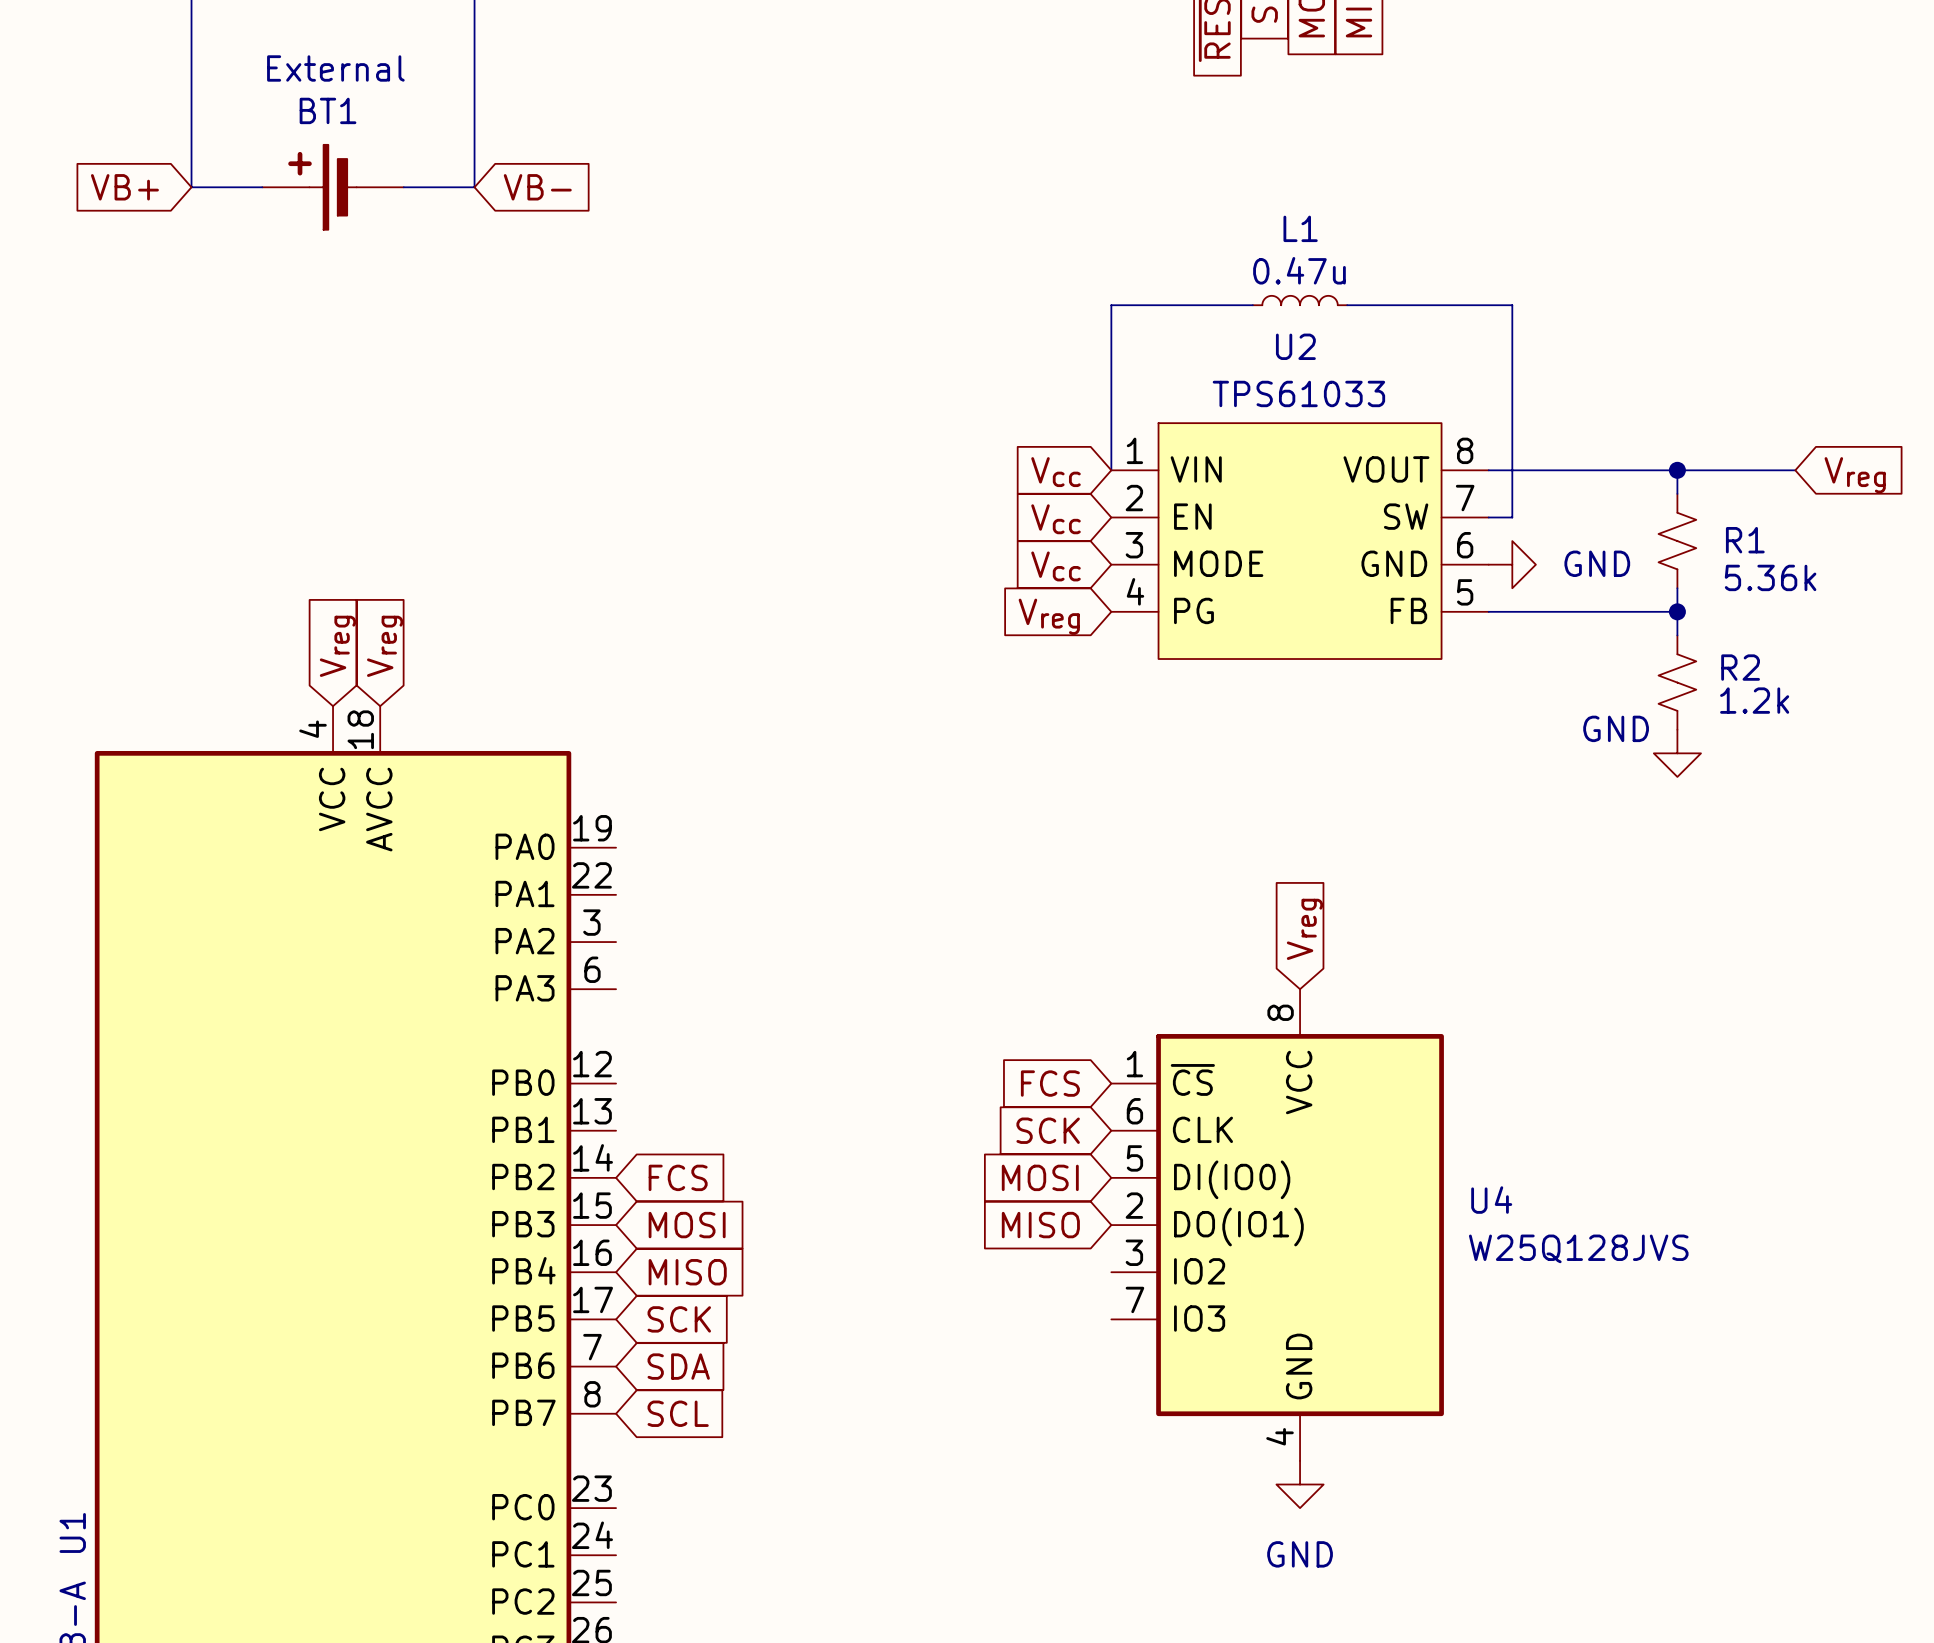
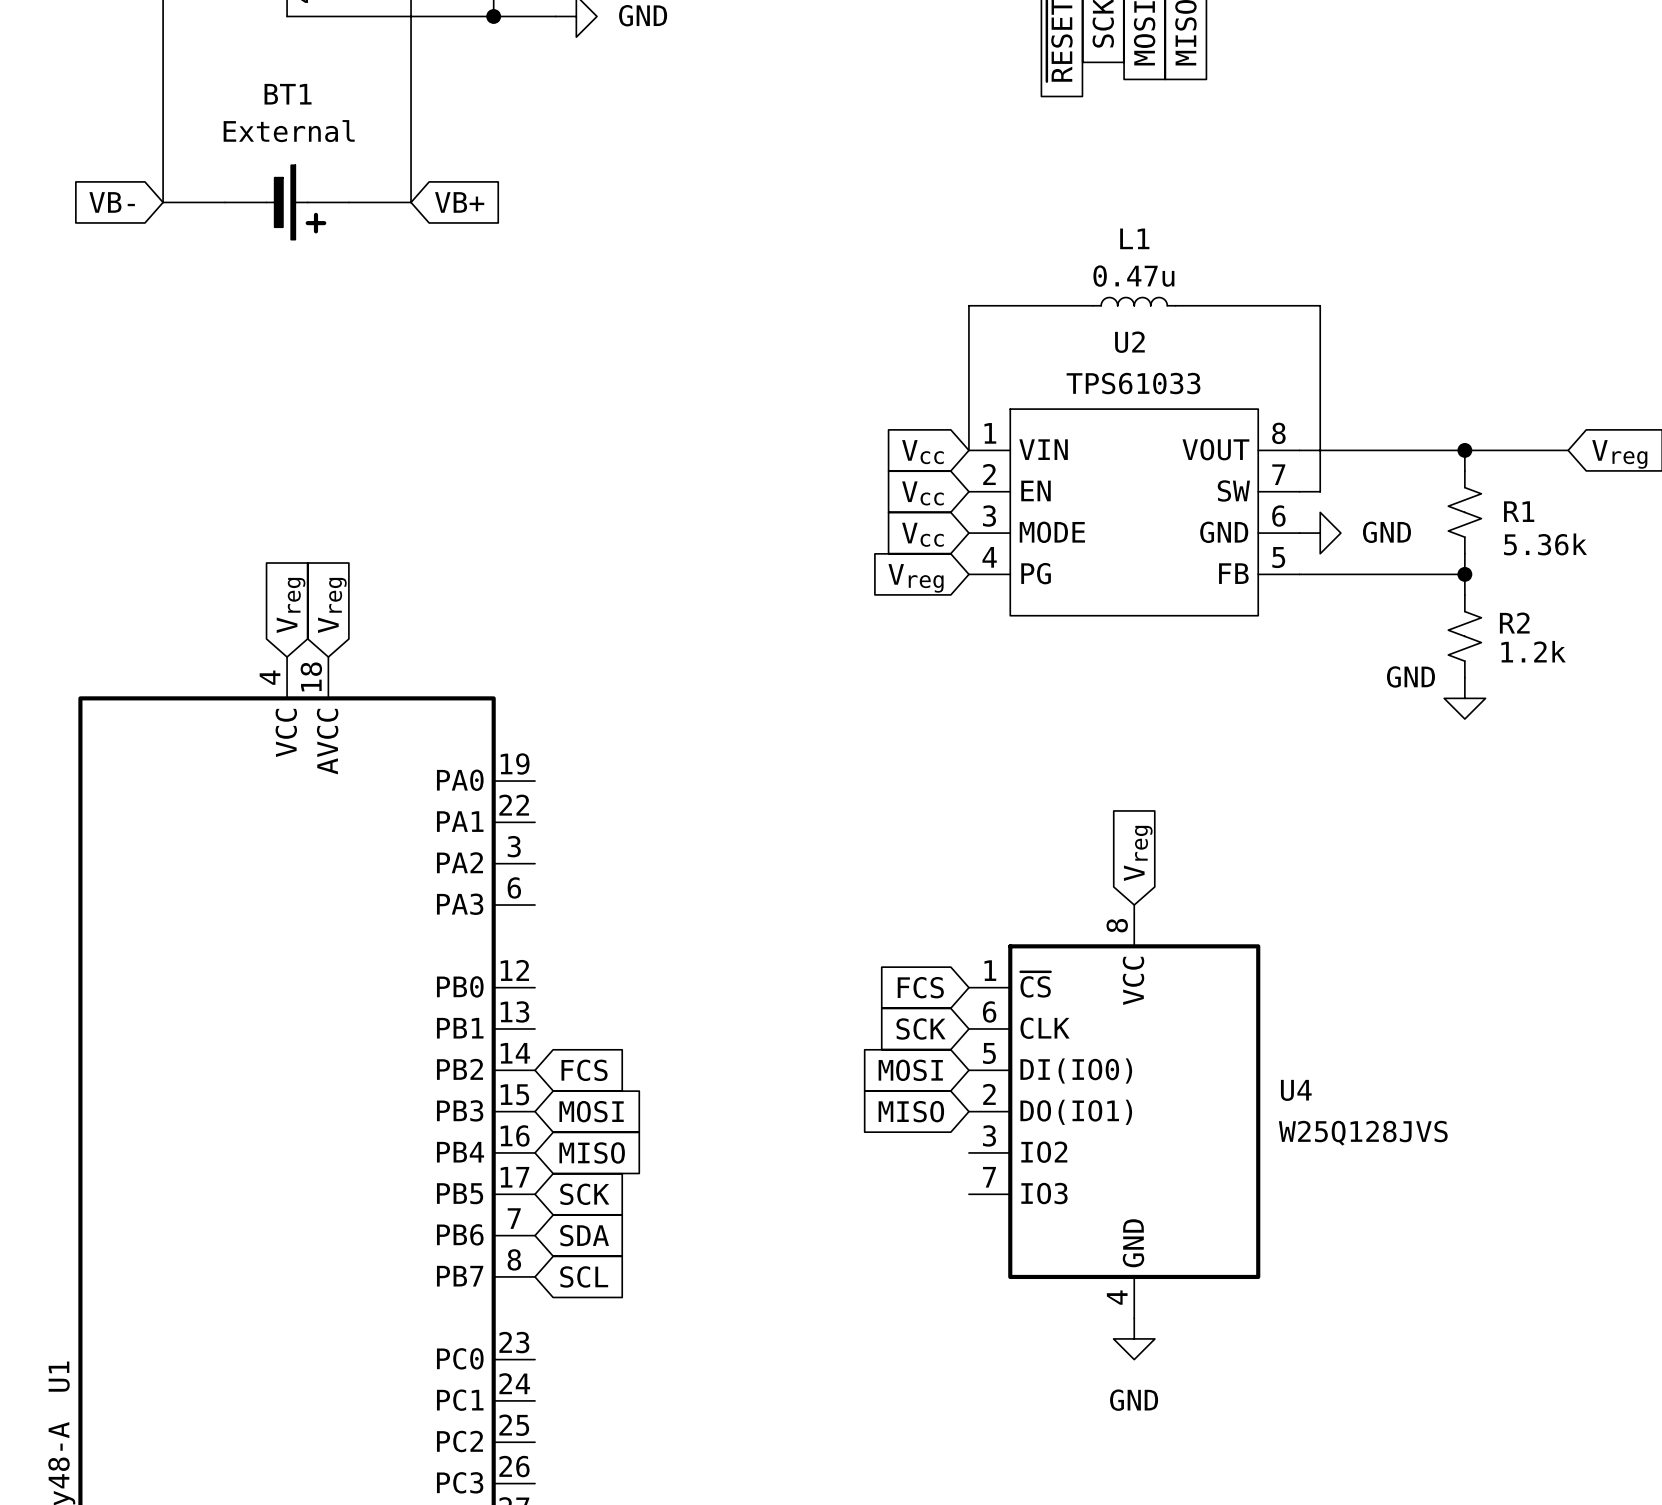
BT1 value position: External (335, 68) -> External (289, 131)
BT1 name position: BT1 (328, 110) -> BT1 (288, 94)
global label: VB+ (124, 187) -> VB- (112, 202)
BT1 rotation: 0° (322, 187) -> 180° (296, 202)
global label: VB- (537, 187) -> VB+ (459, 202)

